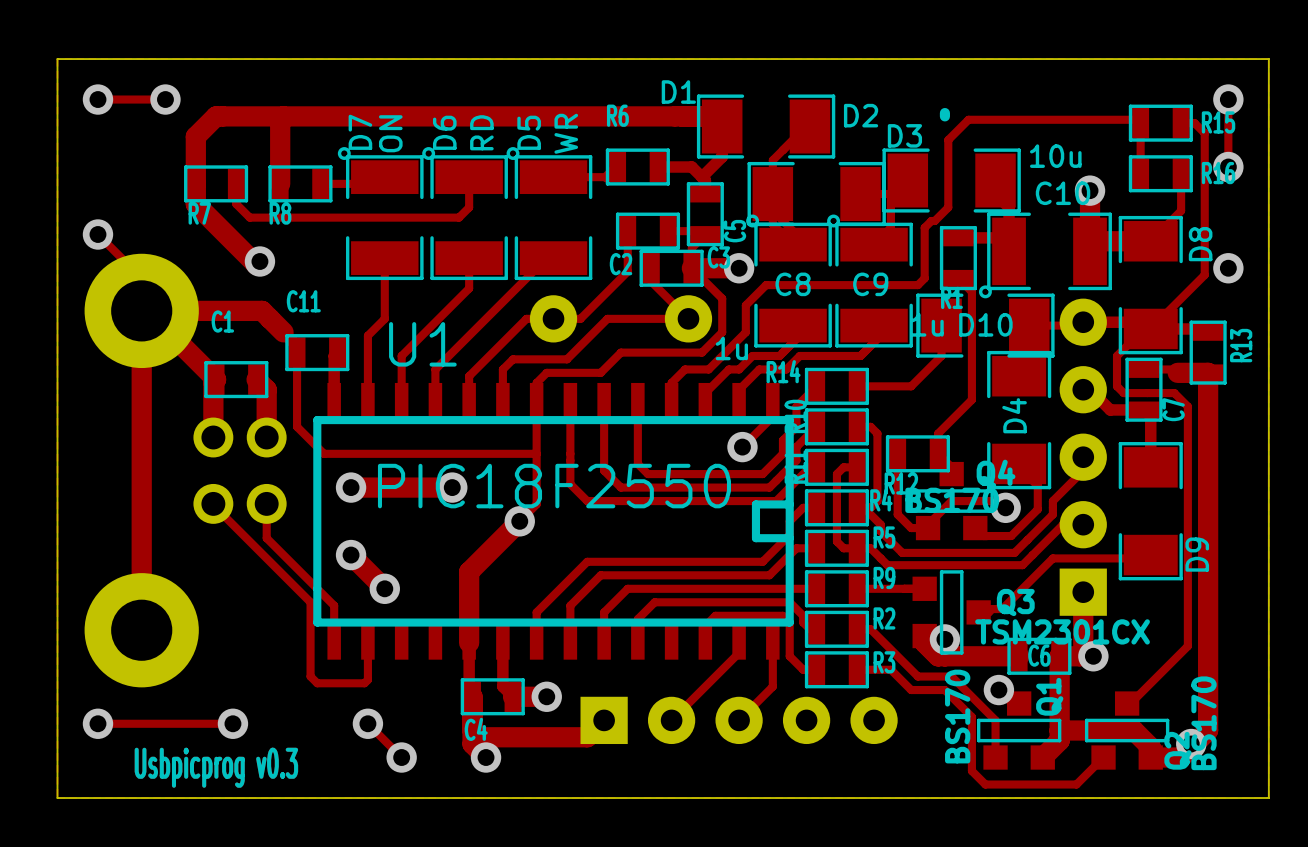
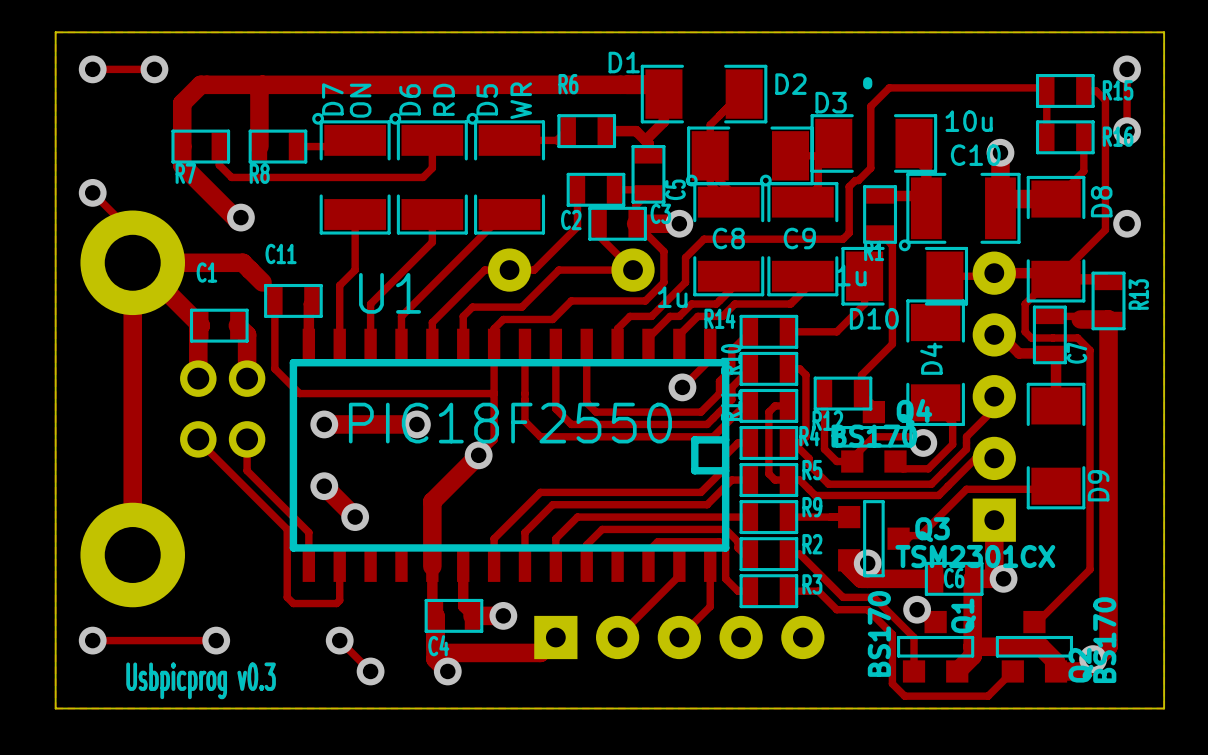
D10 name position: D10 (985, 324) -> D10 (874, 318)

